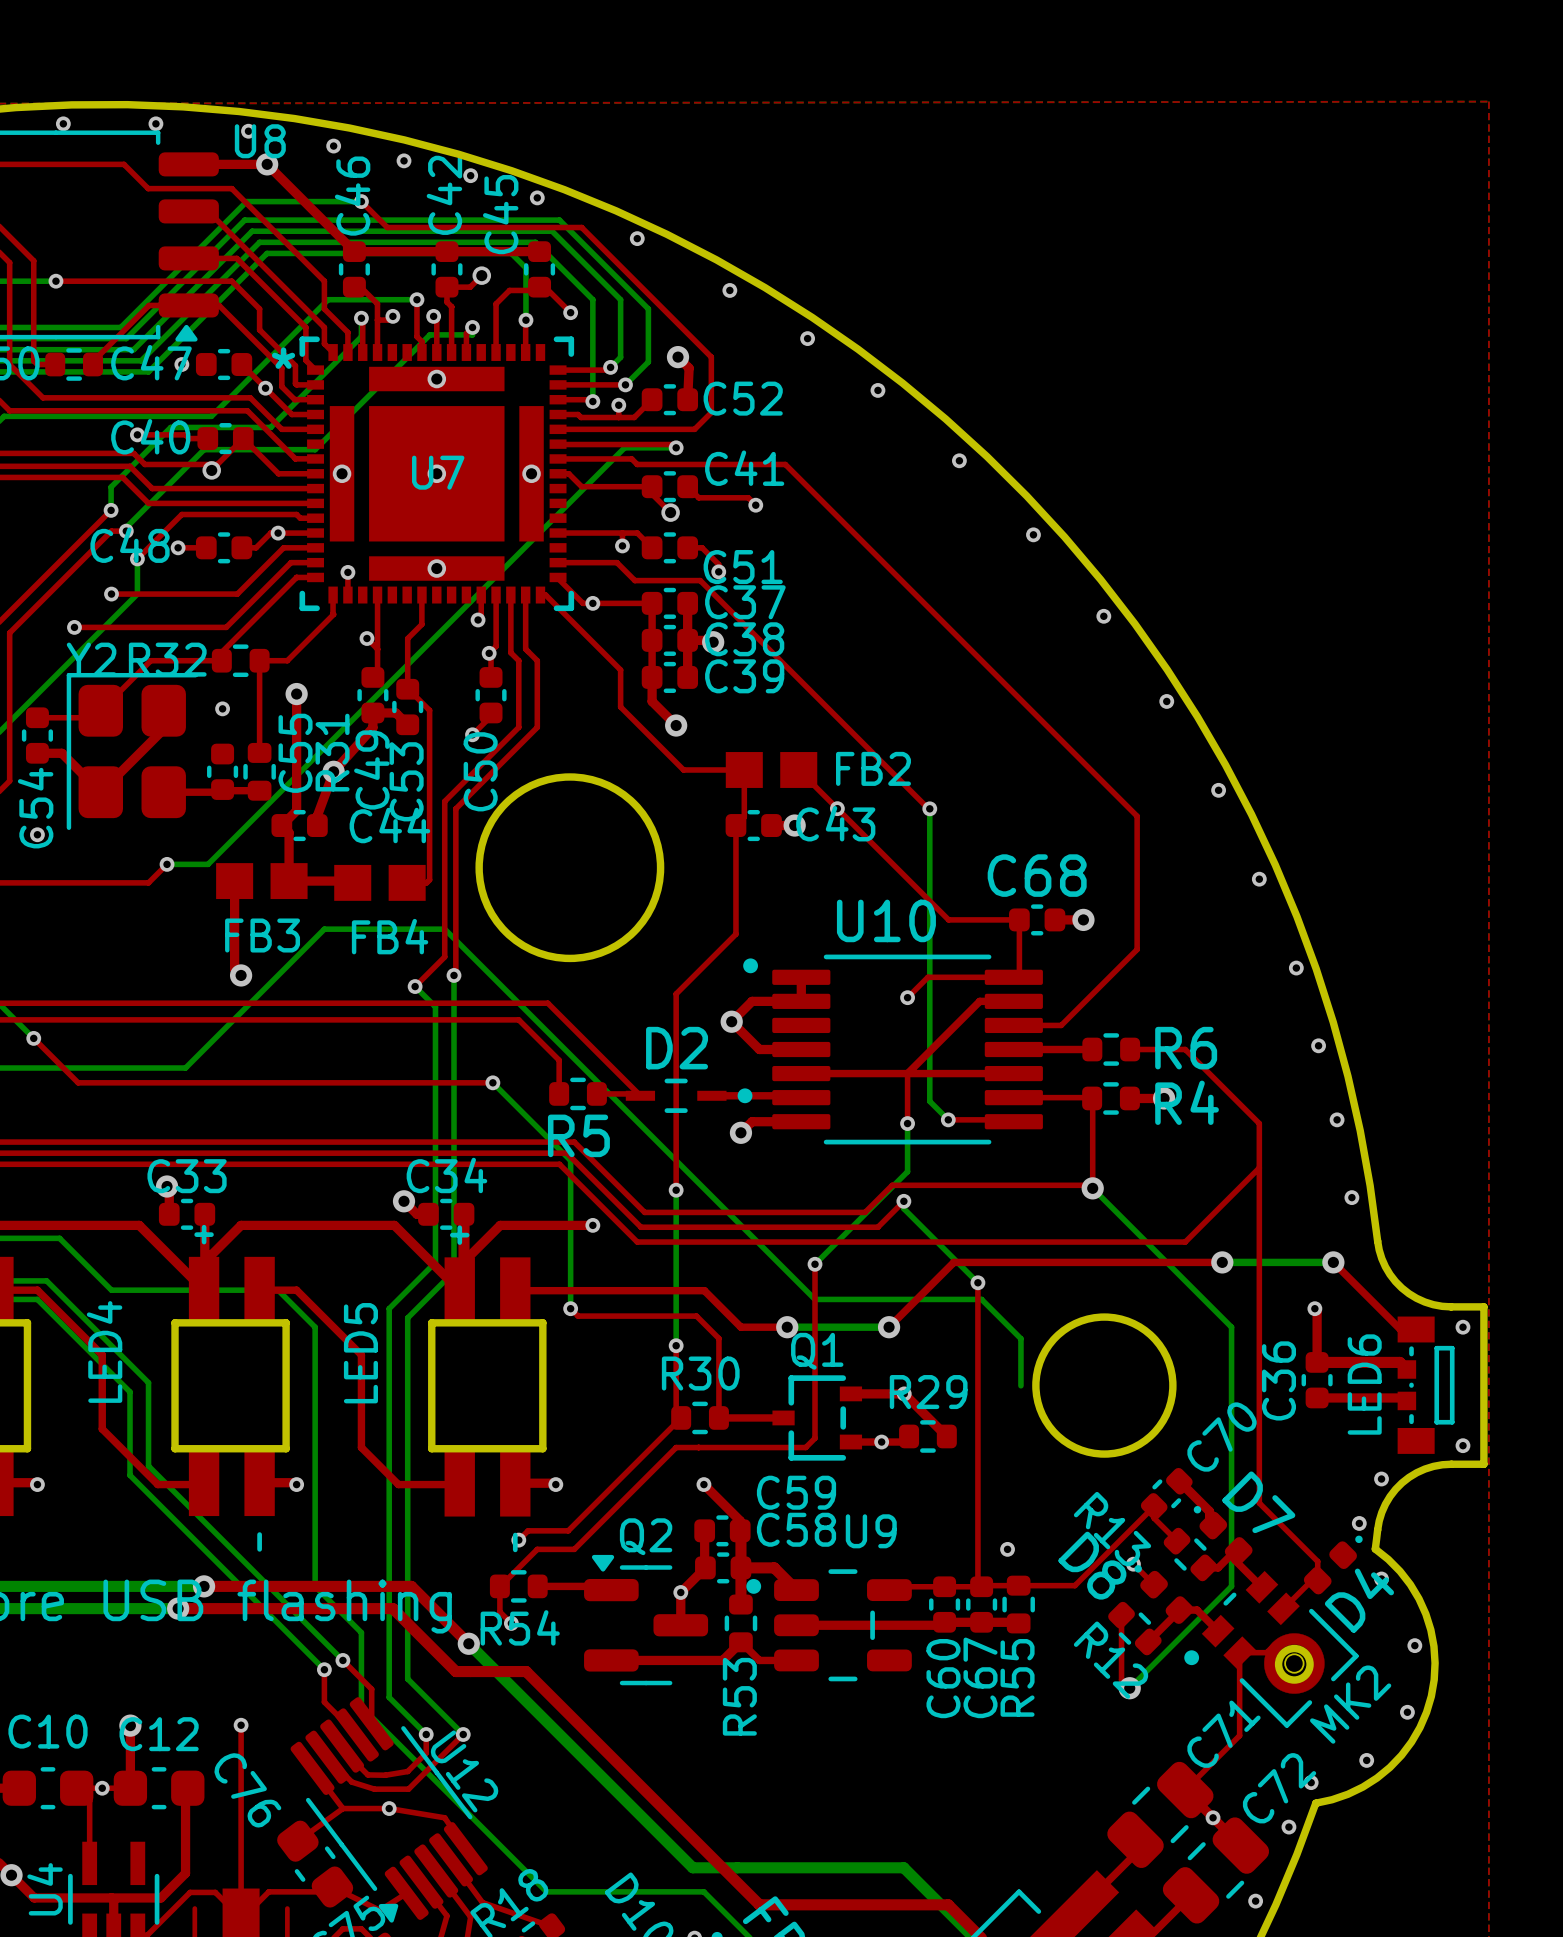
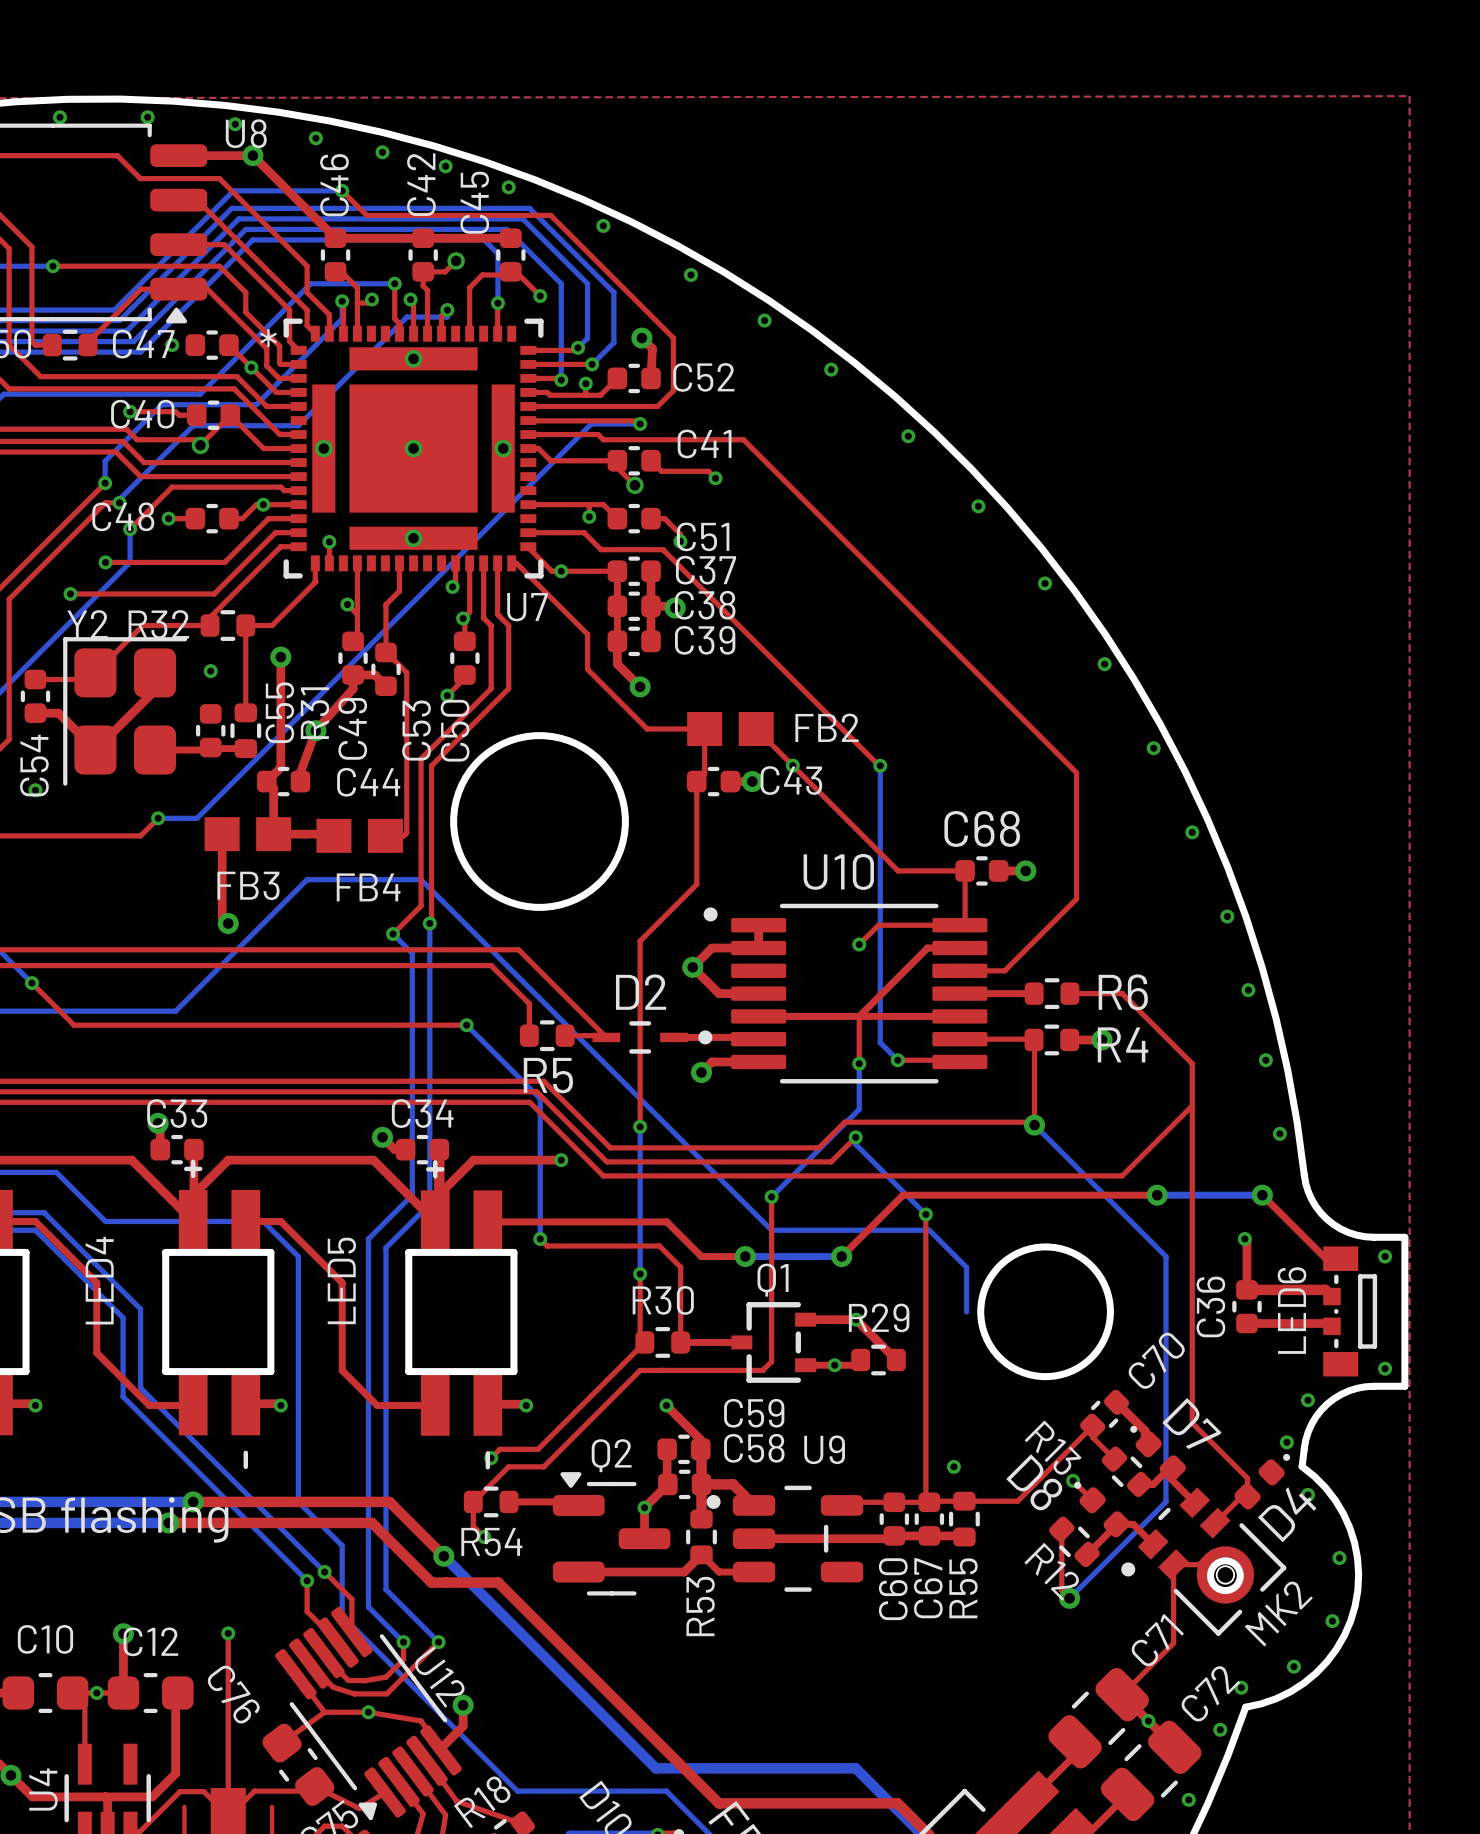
U7 name position: U7 (438, 472) -> U7 (527, 607)
C53 name position: C53 (406, 781) -> C53 (416, 730)
top track: none -> (463, 1705) (463, 1726) (441, 1750)
via: none -> (463, 1705)

